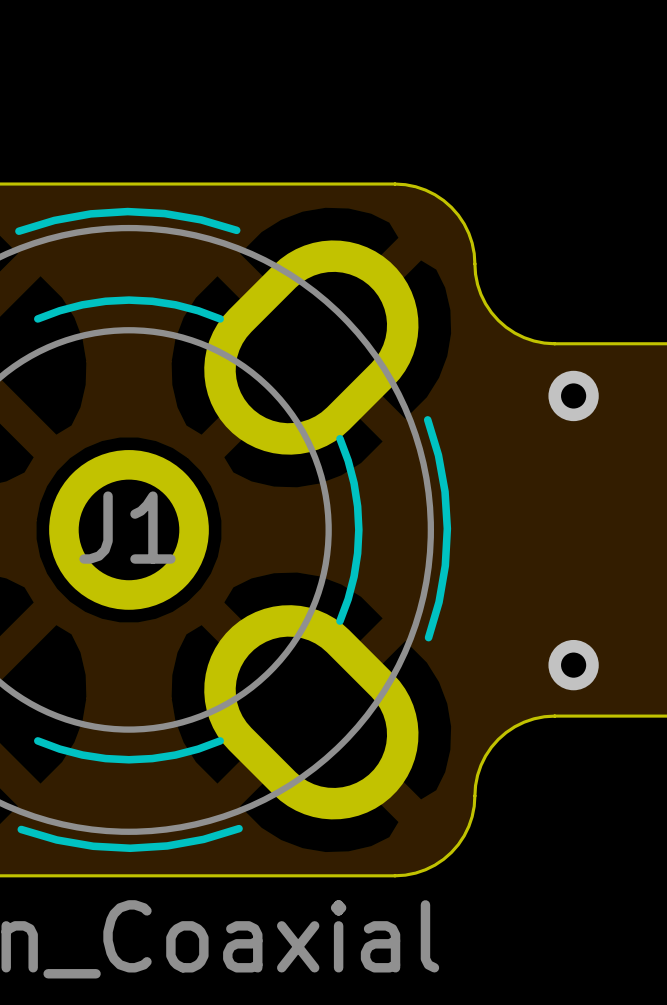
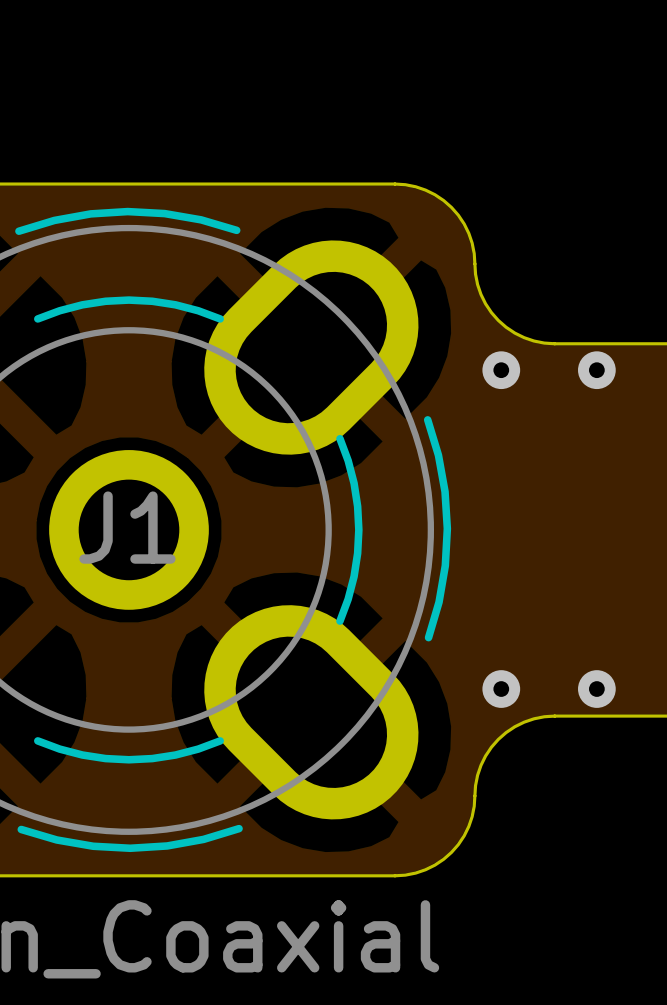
via: none -> (501, 370)
via position: (573, 395) -> (596, 370)
via position: (573, 665) -> (596, 689)
via: none -> (501, 689)

